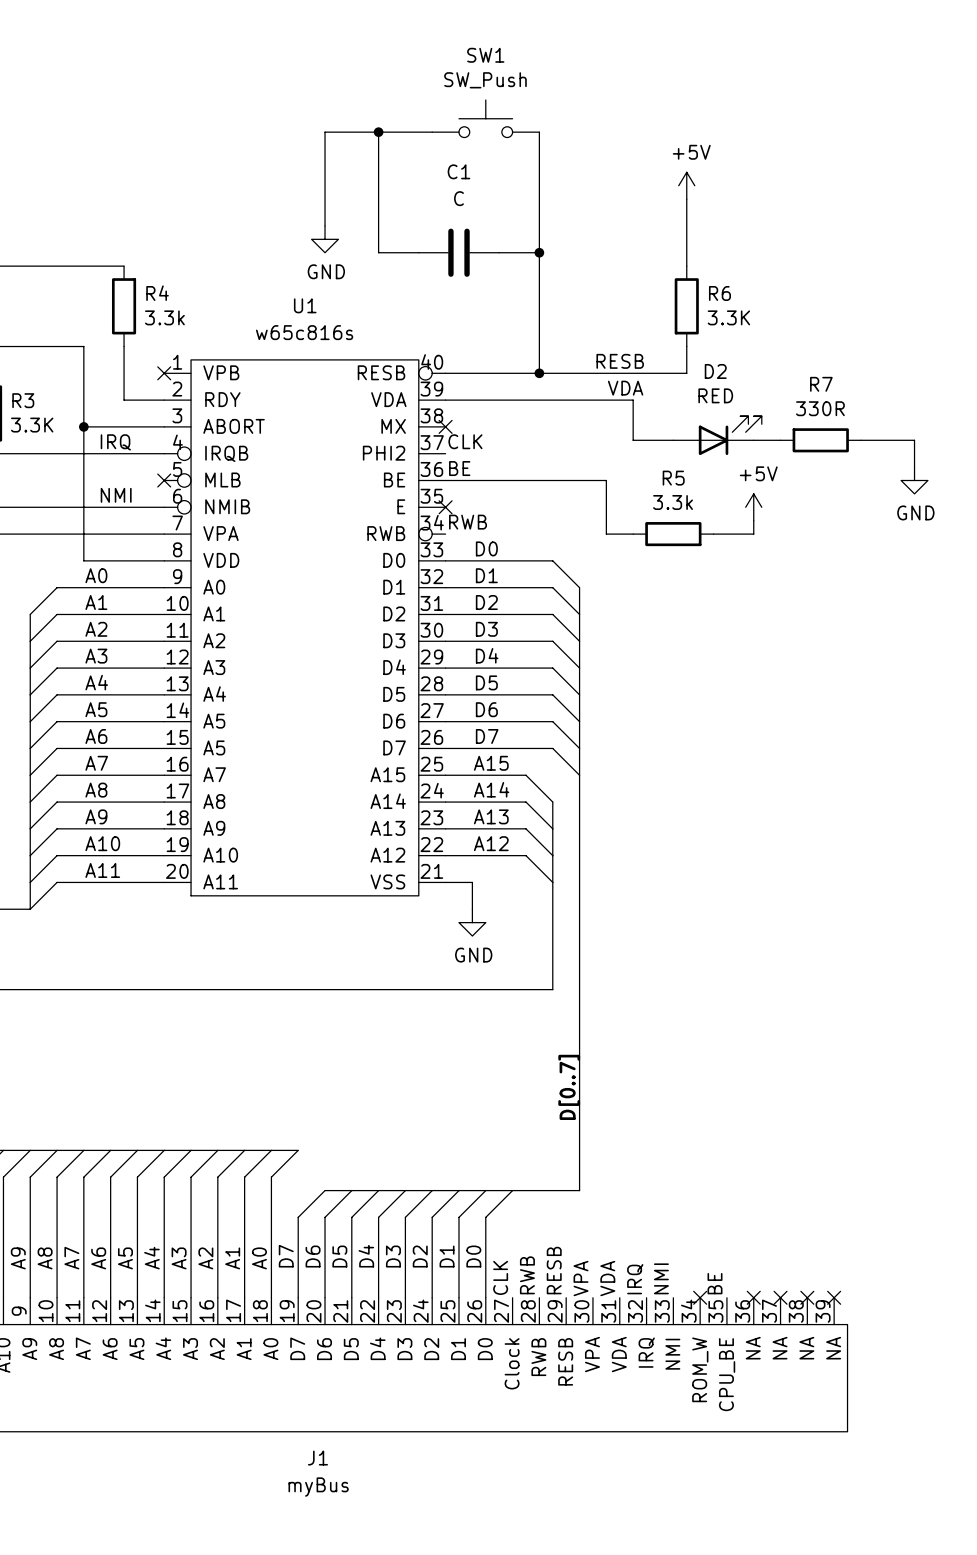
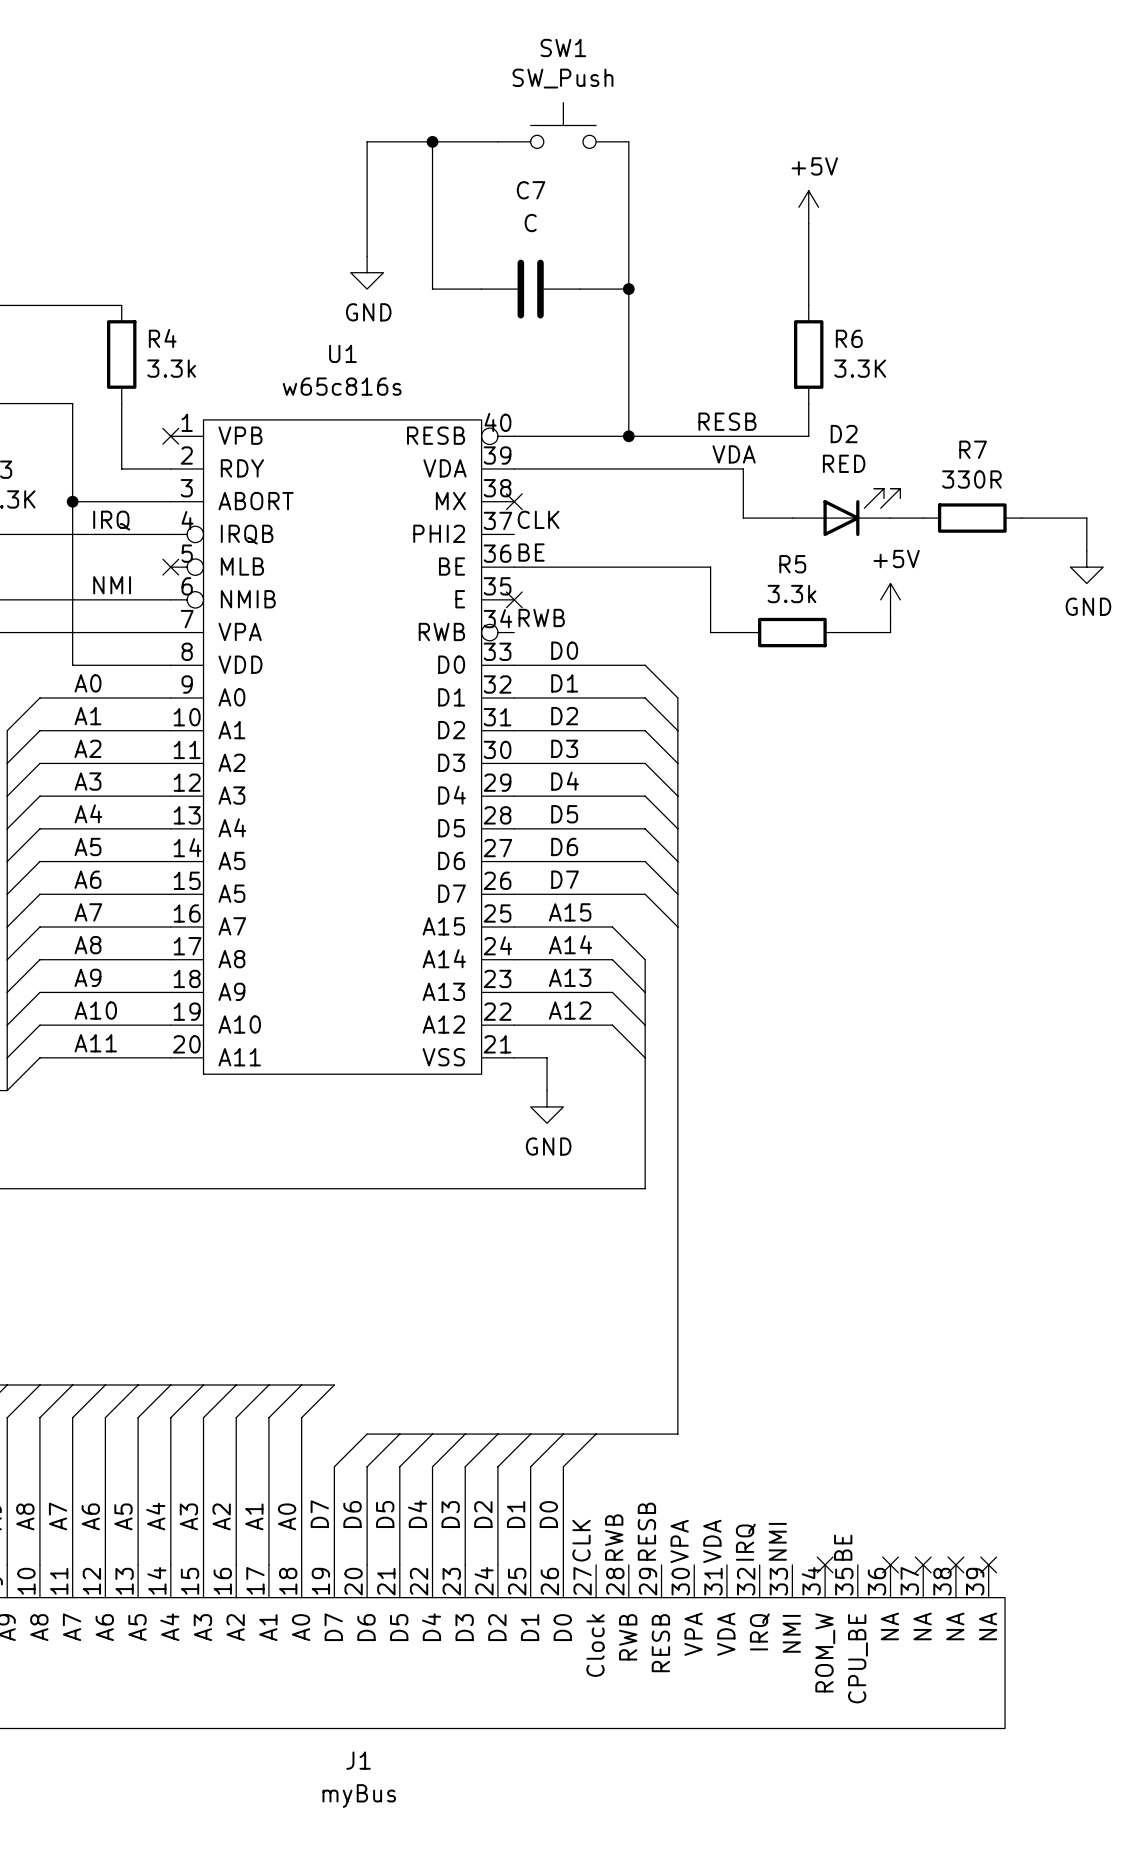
C1 name: C1 (458, 171) -> C7 (531, 190)
label: D[0..7] (569, 1087) -> none

